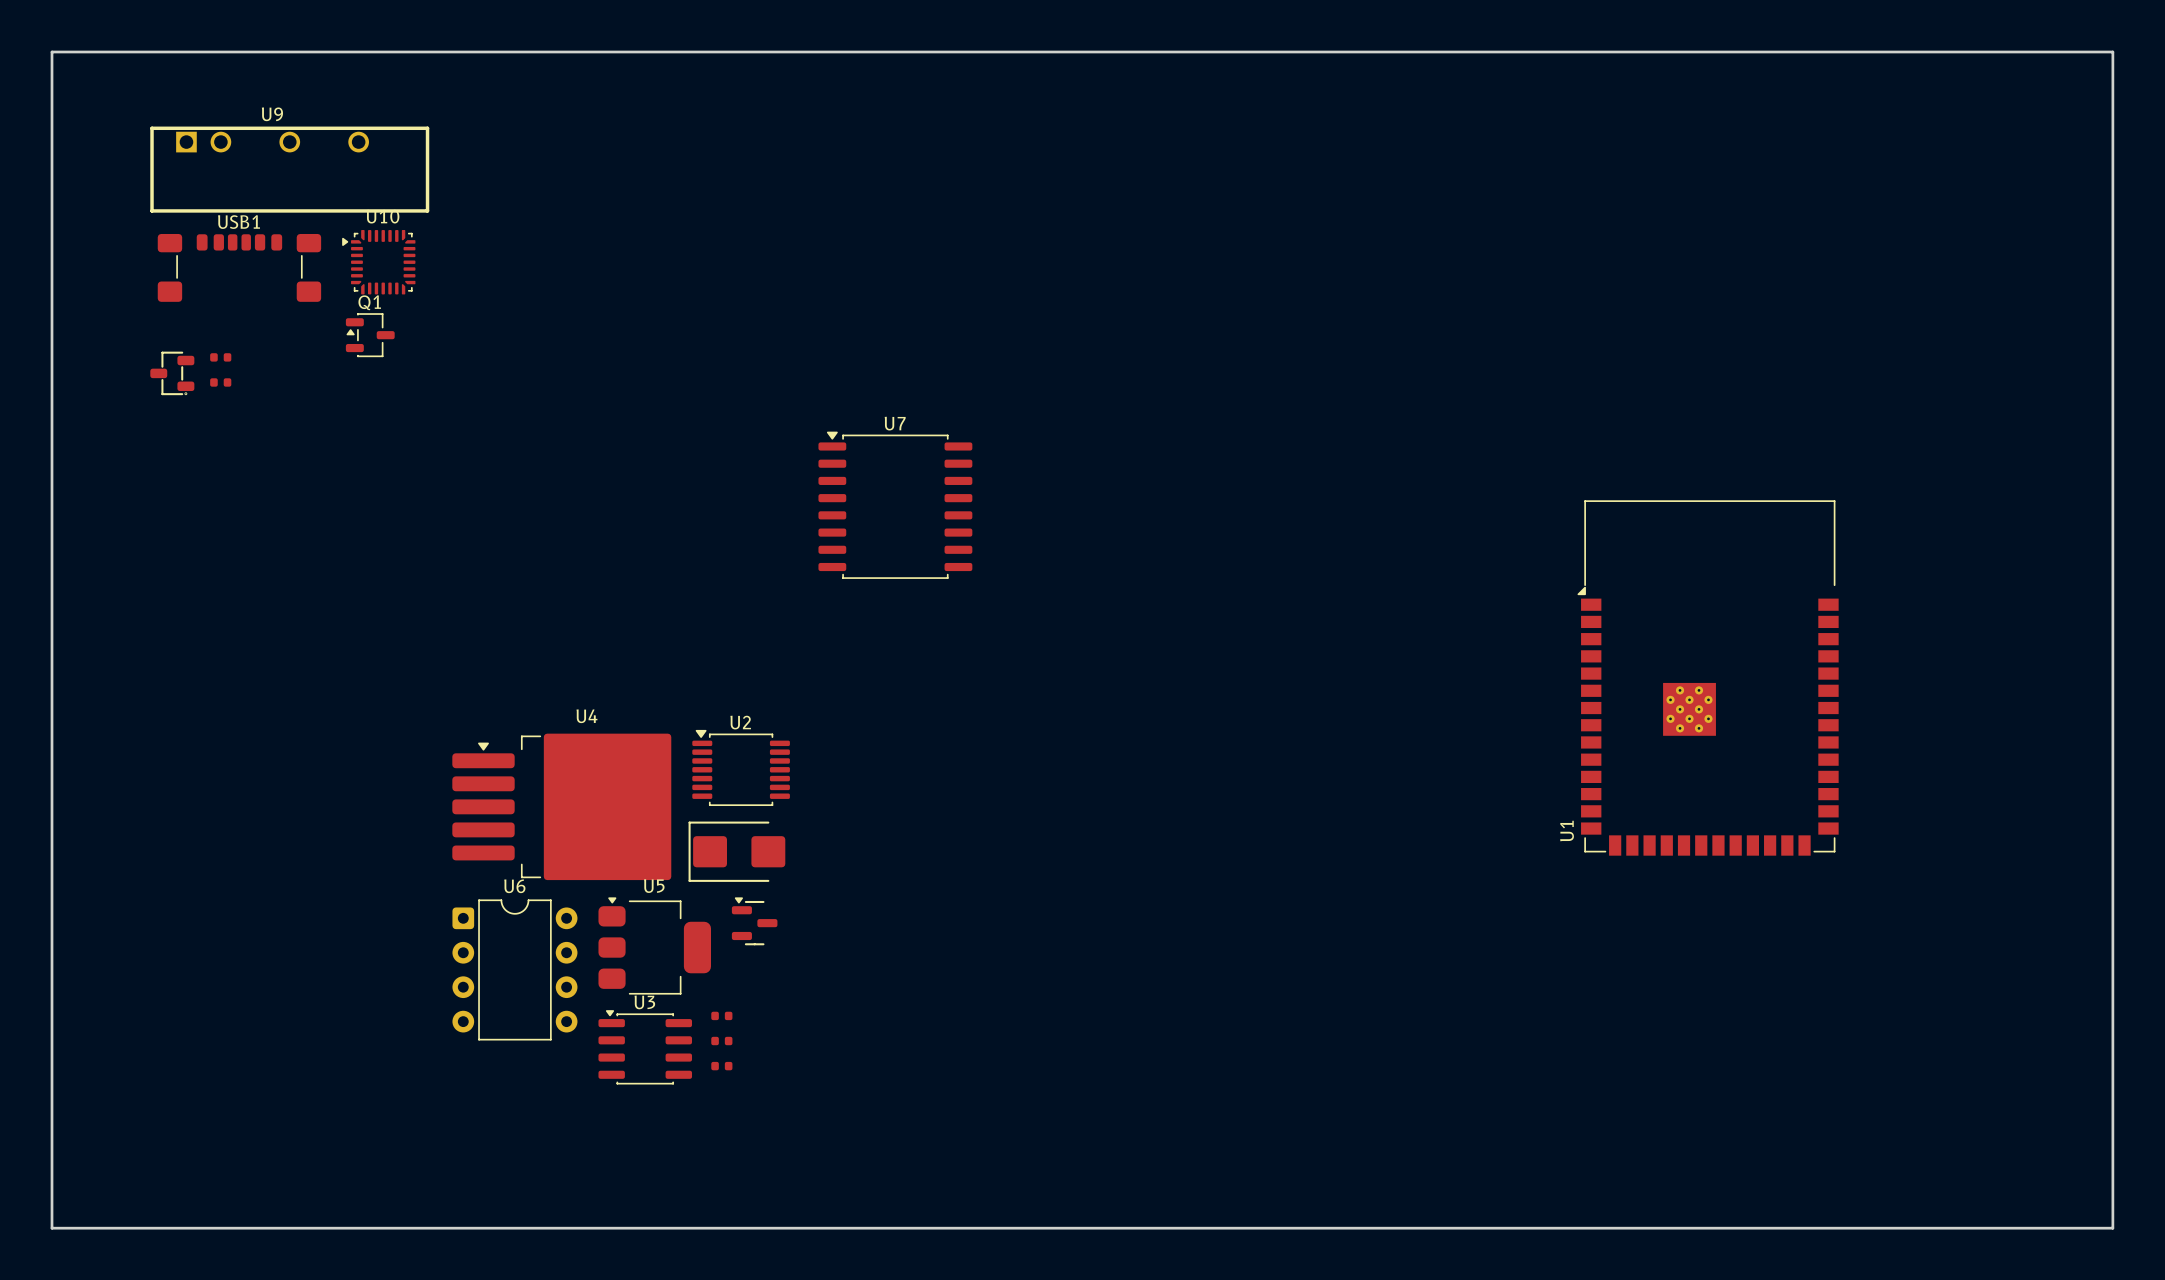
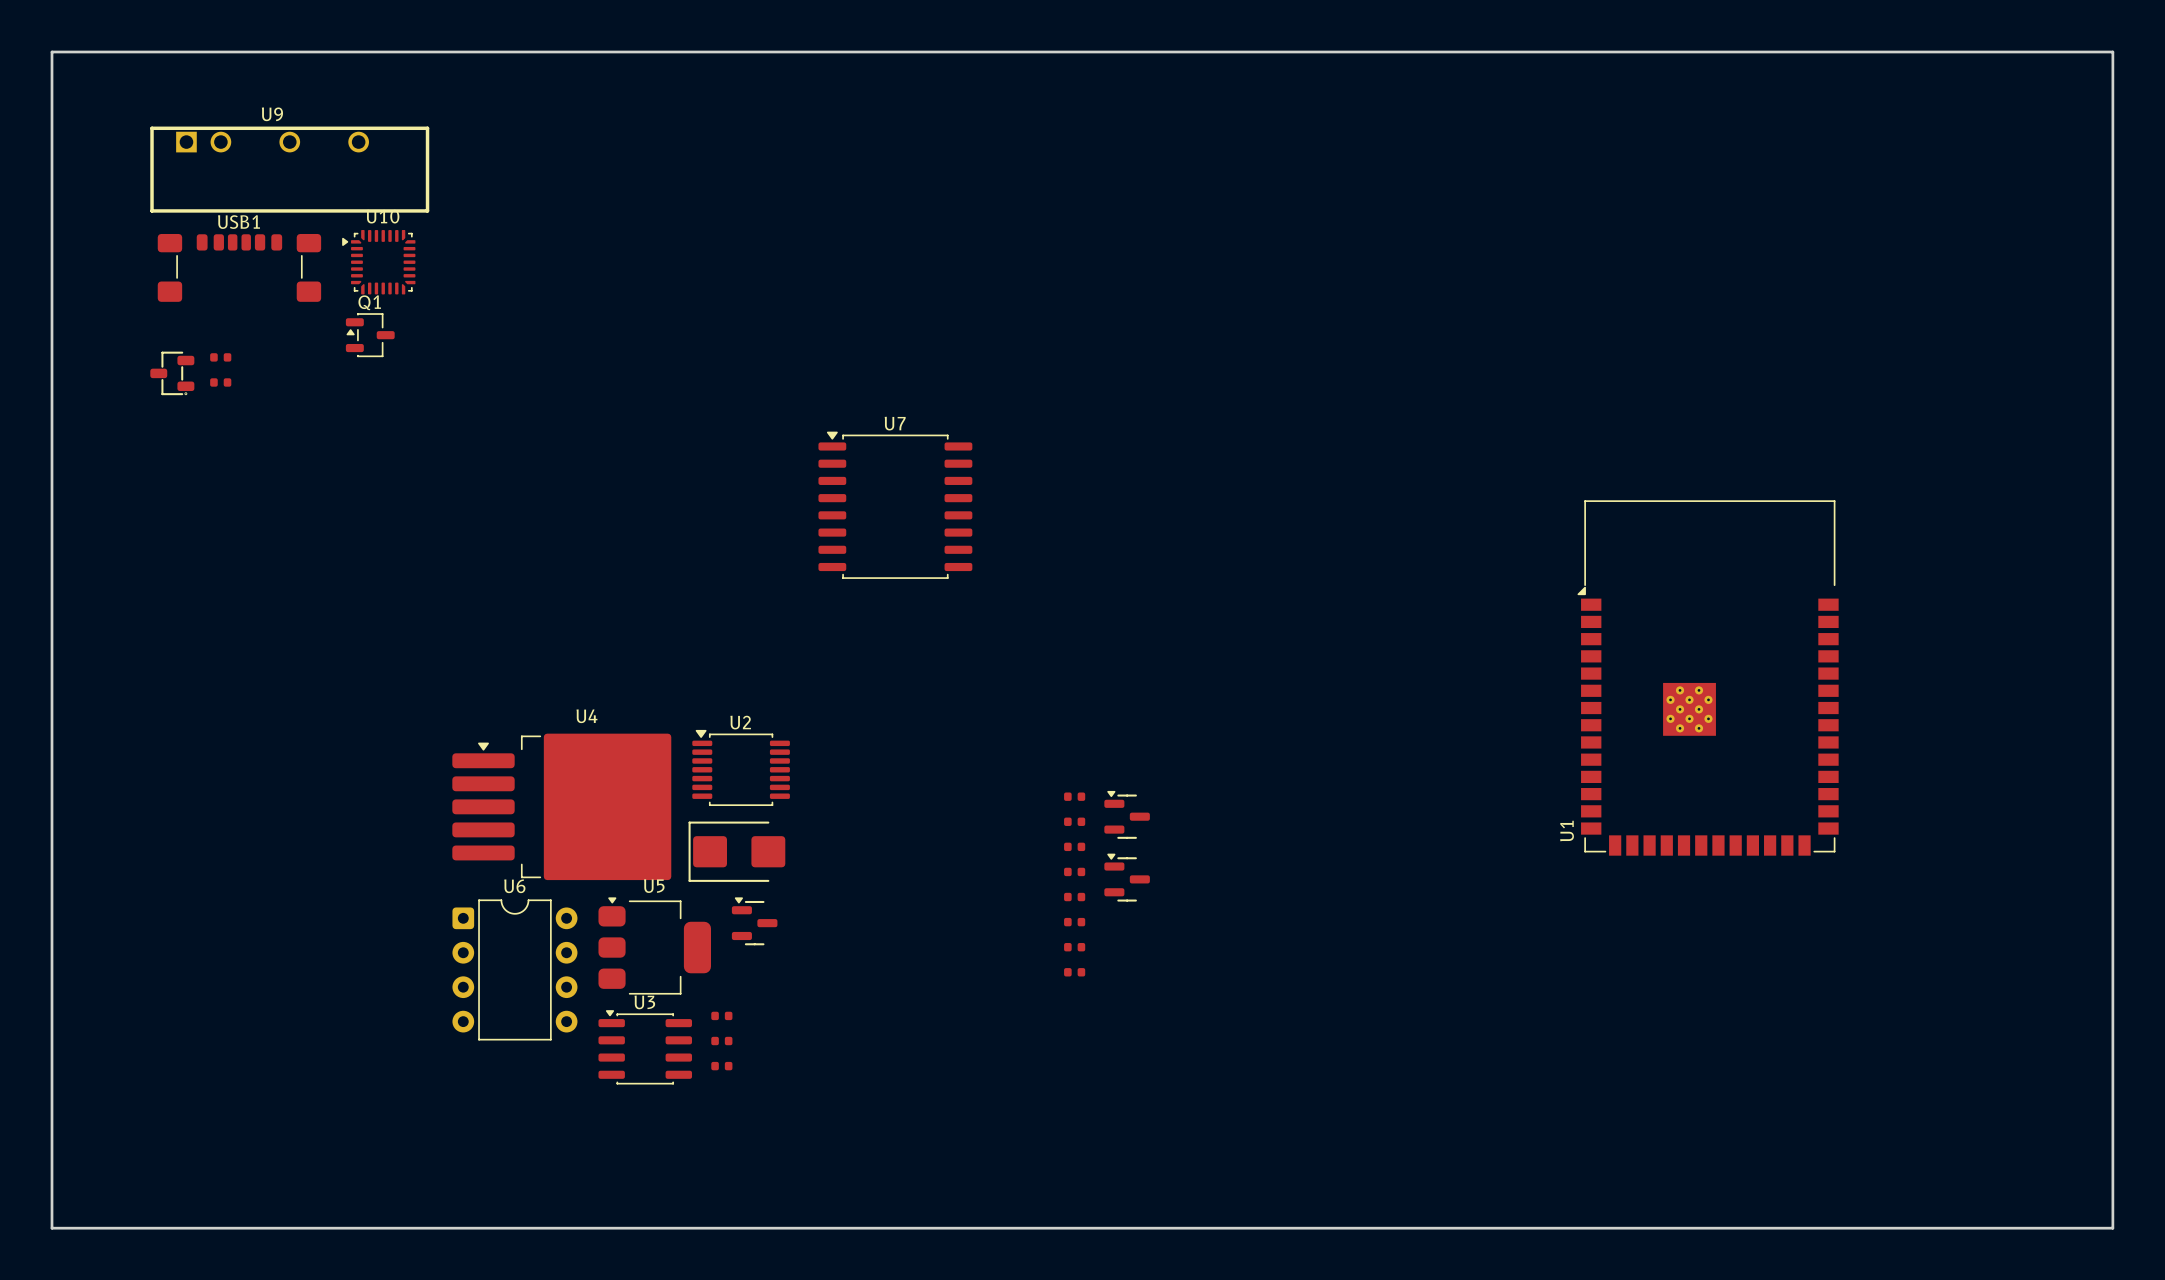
part: none -> (1074, 796)
part: none -> (1127, 814)
part: none -> (1074, 821)
part: none -> (1074, 846)
part: none -> (1074, 871)
part: none -> (1127, 877)
part: none -> (1074, 897)
part: none -> (1074, 922)
part: none -> (1074, 947)
part: none -> (1074, 972)

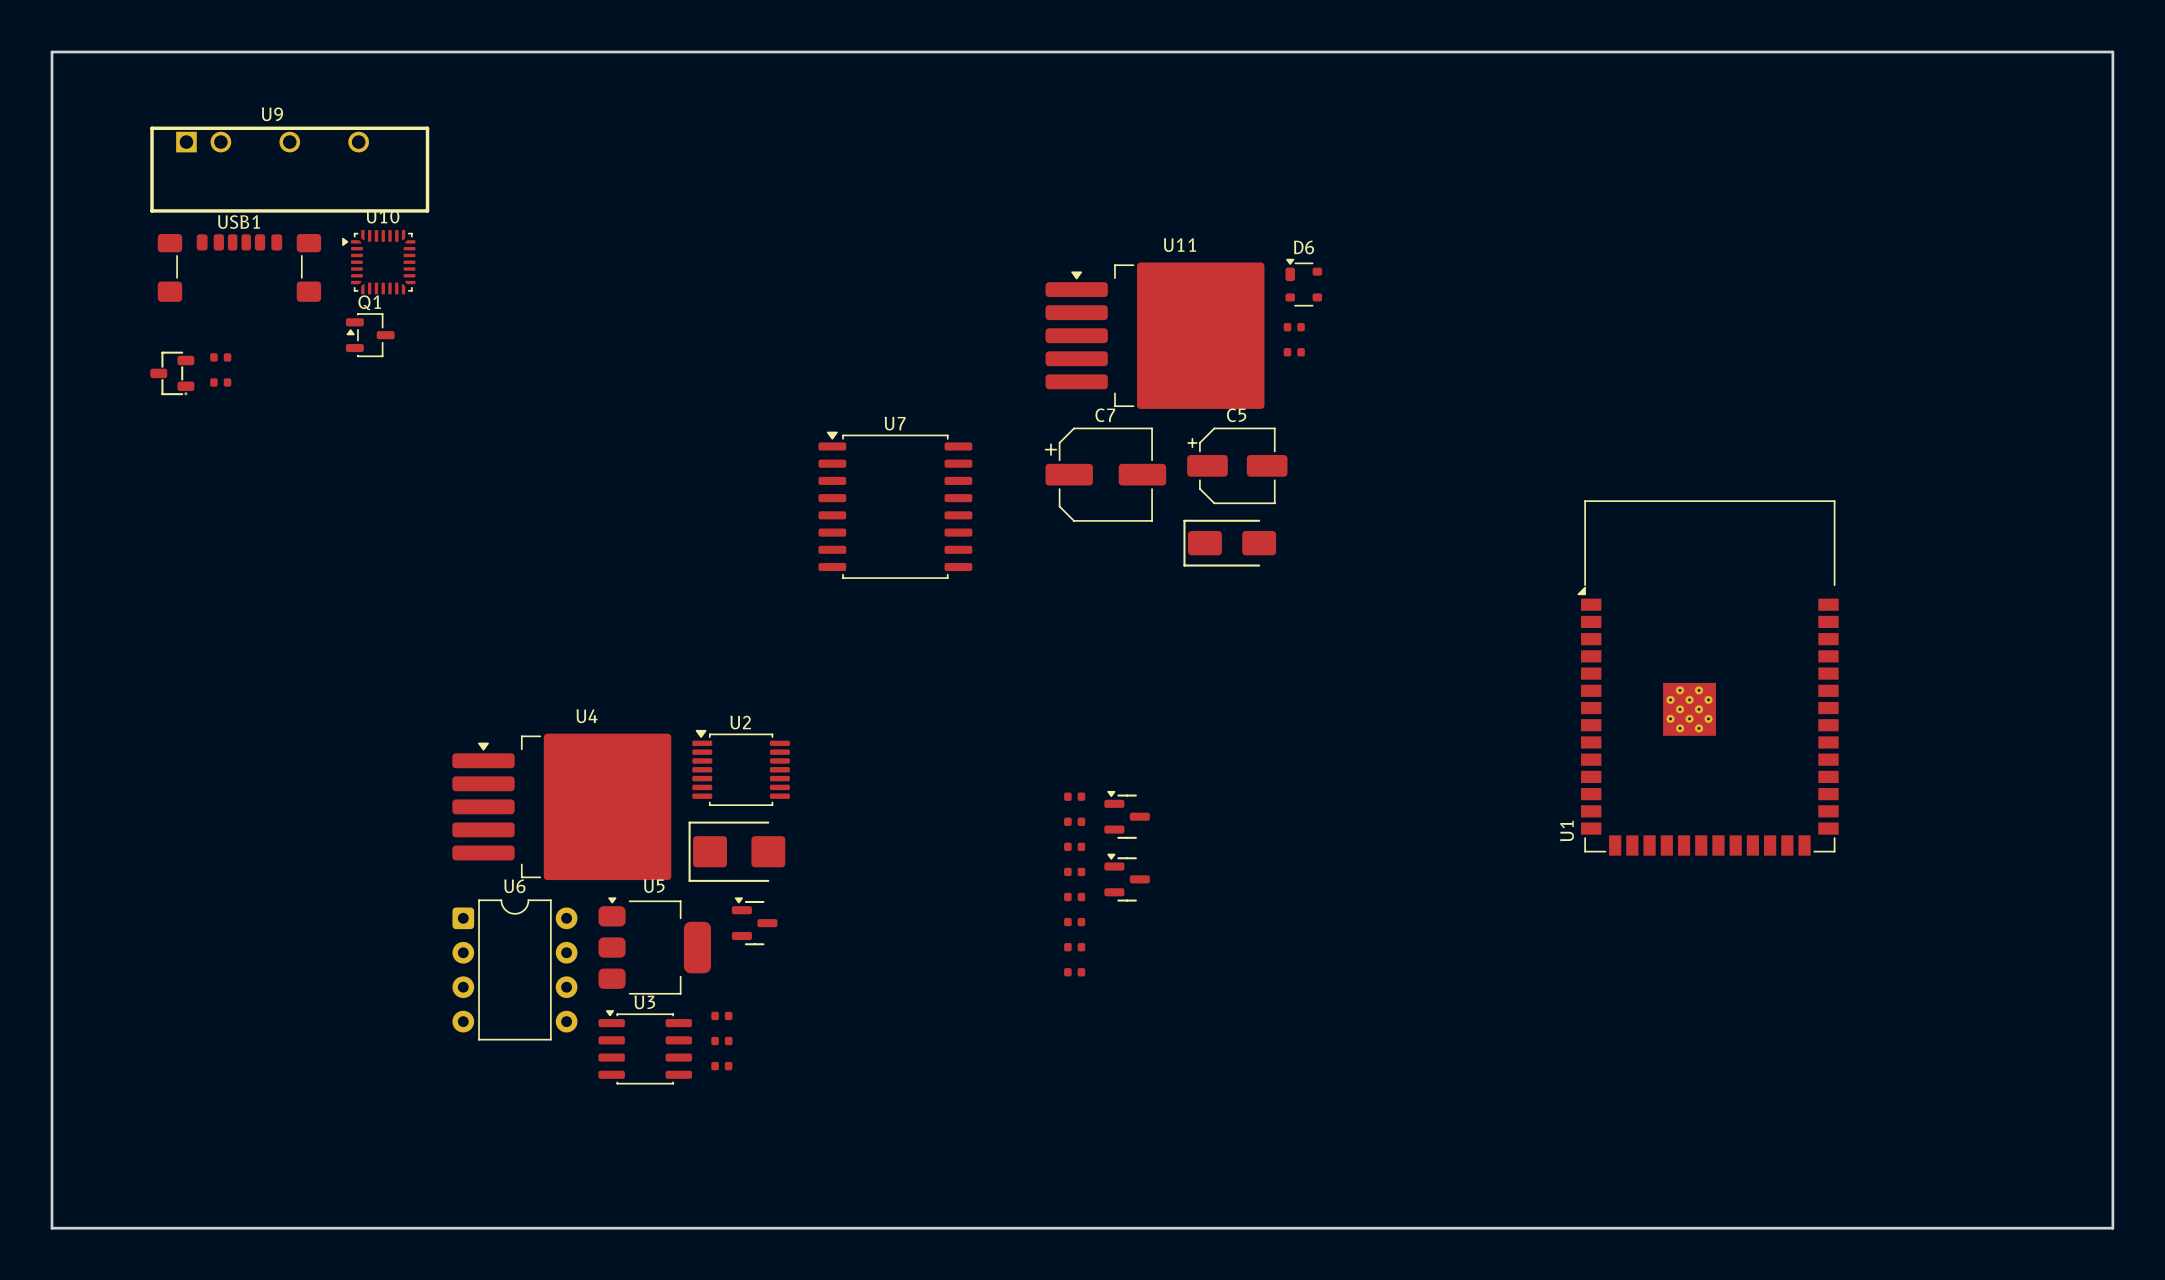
D6: none -> (1303, 282)
part: none -> (1294, 327)
U11: none -> (1154, 335)
part: none -> (1294, 352)
C5: none -> (1237, 465)
C7: none -> (1105, 474)
part: none -> (1229, 543)

